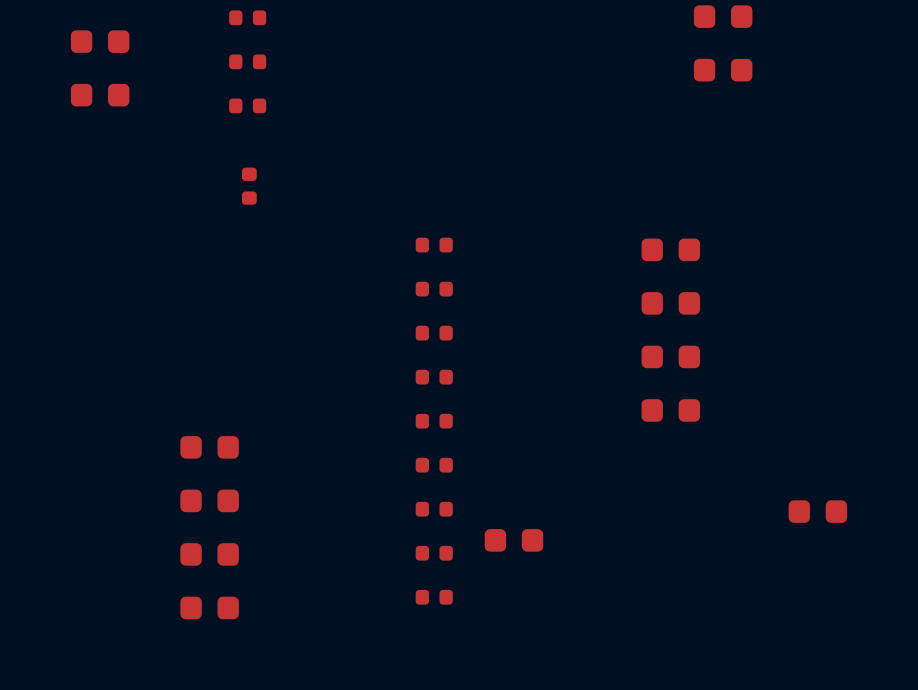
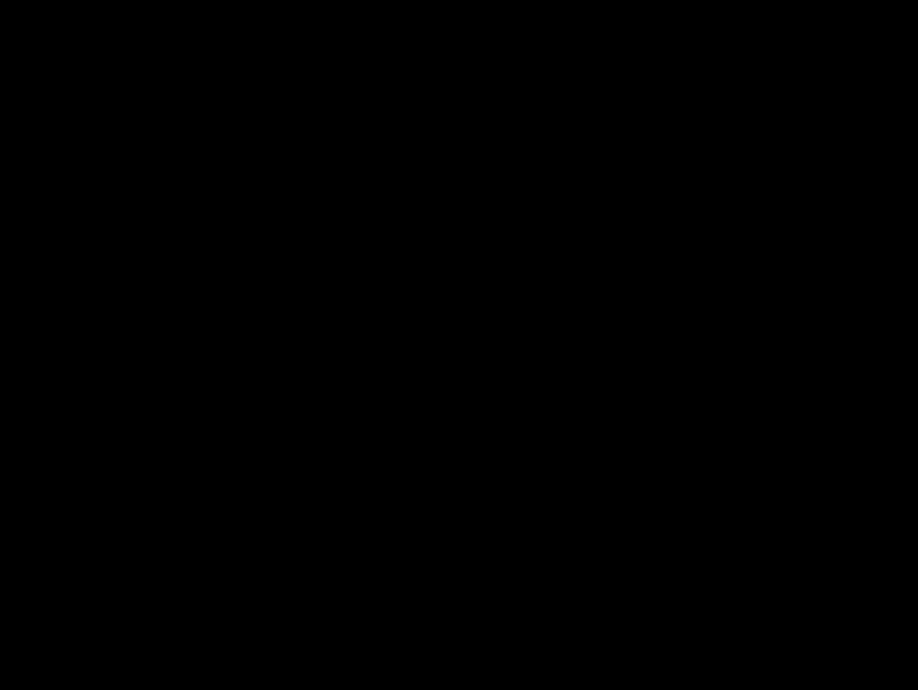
part: (723, 16) -> none
part: (247, 17) -> none
part: (100, 41) -> none
part: (247, 61) -> none
part: (723, 70) -> none
part: (100, 95) -> none
part: (247, 105) -> none
part: (249, 186) -> none
part: (434, 245) -> none
part: (670, 249) -> none
part: (434, 289) -> none
part: (670, 303) -> none
part: (434, 333) -> none
part: (670, 356) -> none
part: (434, 377) -> none
part: (670, 410) -> none
part: (434, 421) -> none
part: (209, 447) -> none
part: (434, 465) -> none
part: (209, 500) -> none
part: (434, 509) -> none
part: (817, 511) -> none
part: (513, 540) -> none
part: (434, 553) -> none
part: (209, 554) -> none
part: (434, 597) -> none
part: (209, 607) -> none

